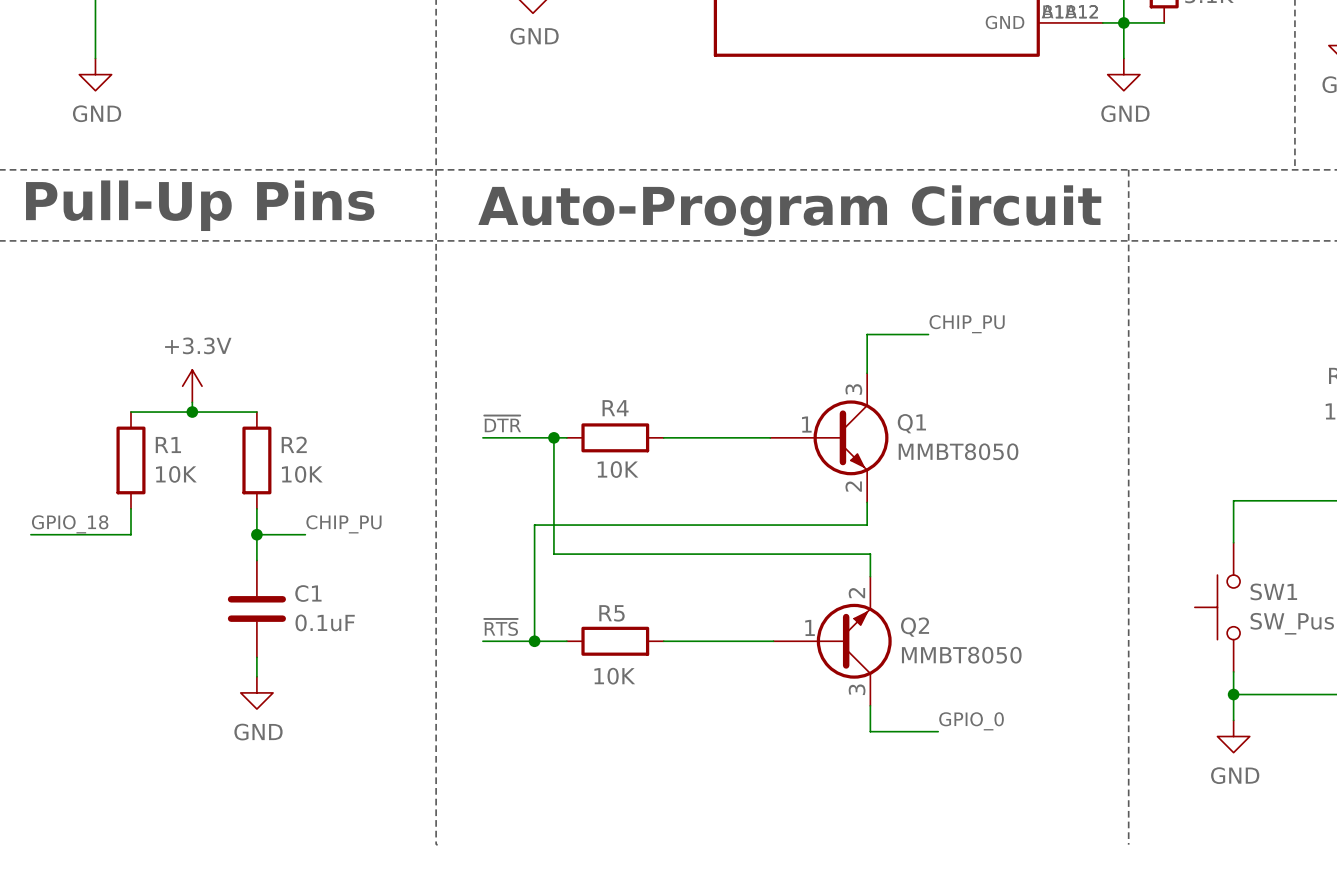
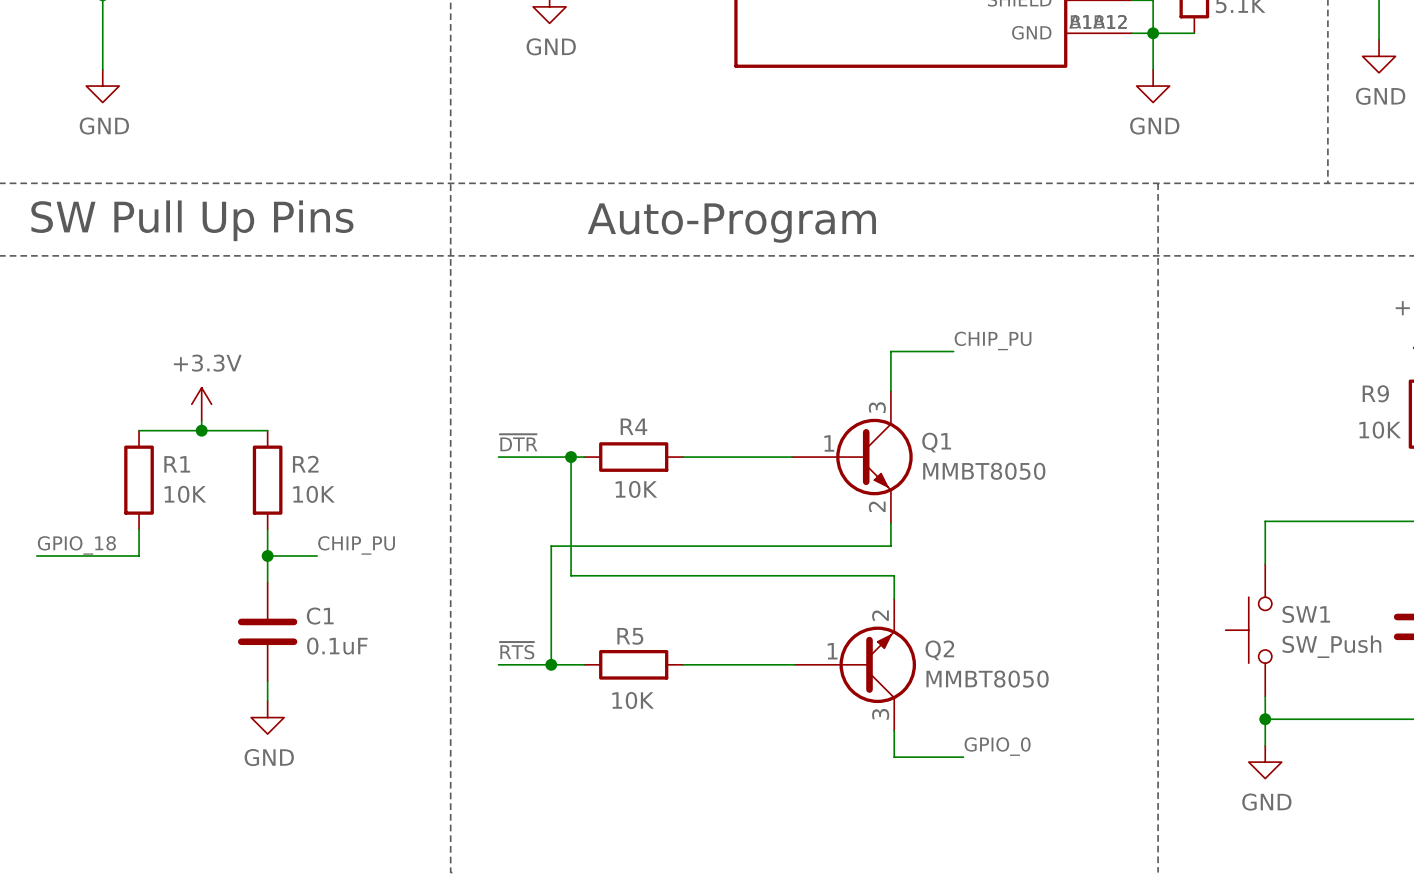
text: Pull-Up Pins (200, 205) -> SW Pull Up Pins (192, 220)
text: Auto-Program Circuit (789, 210) -> Auto-Program (731, 223)

